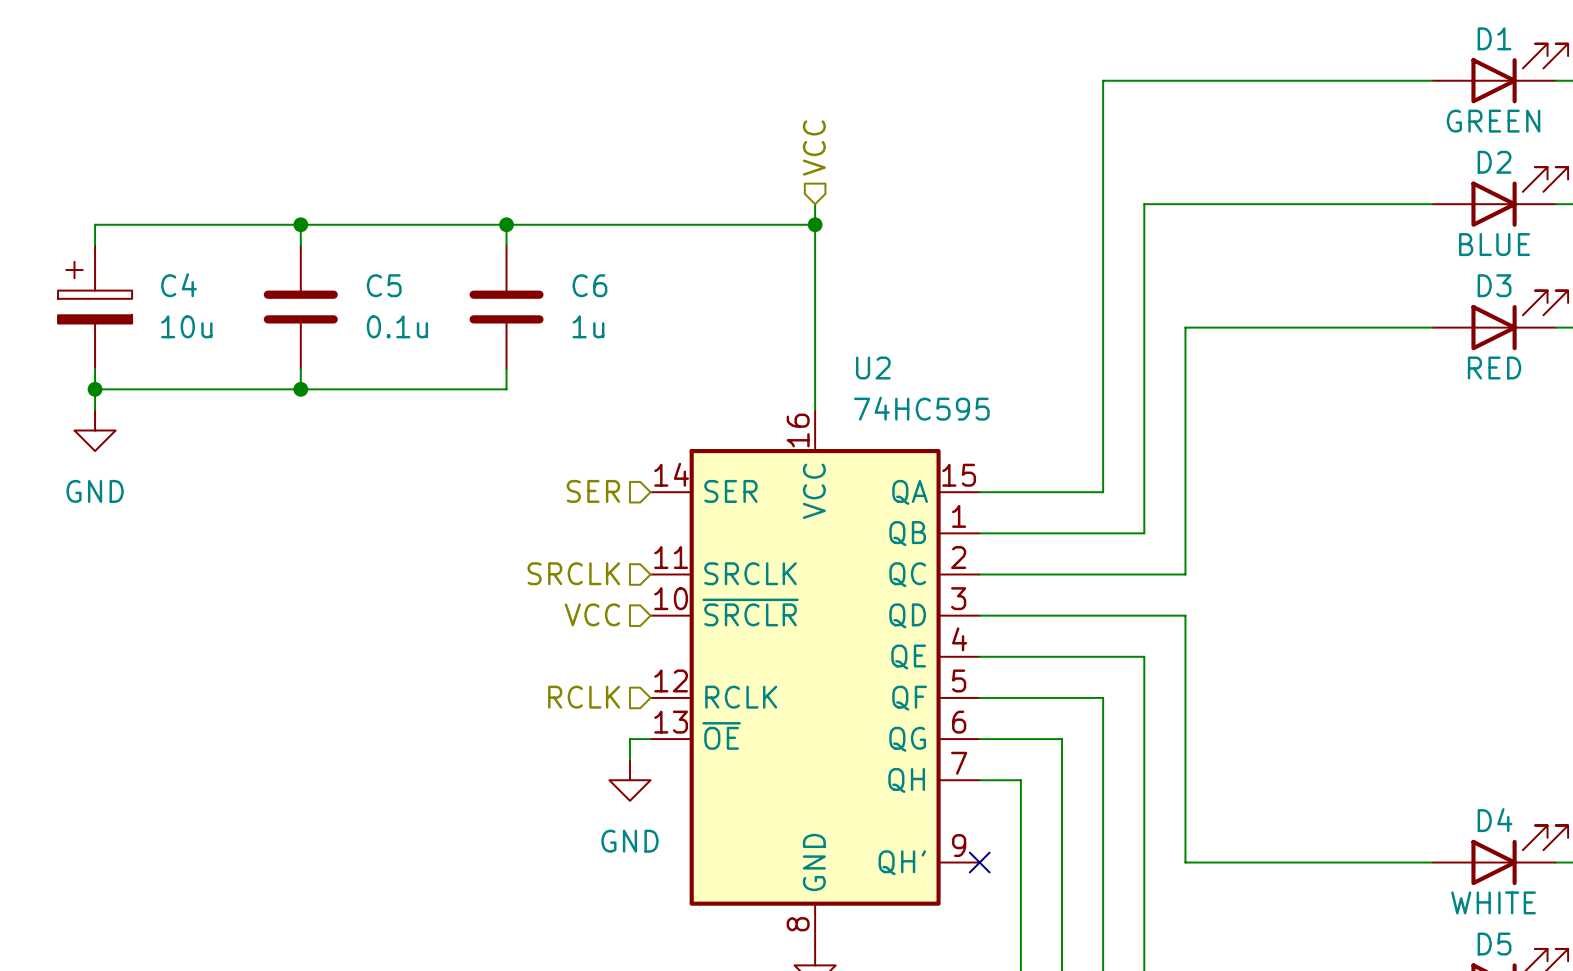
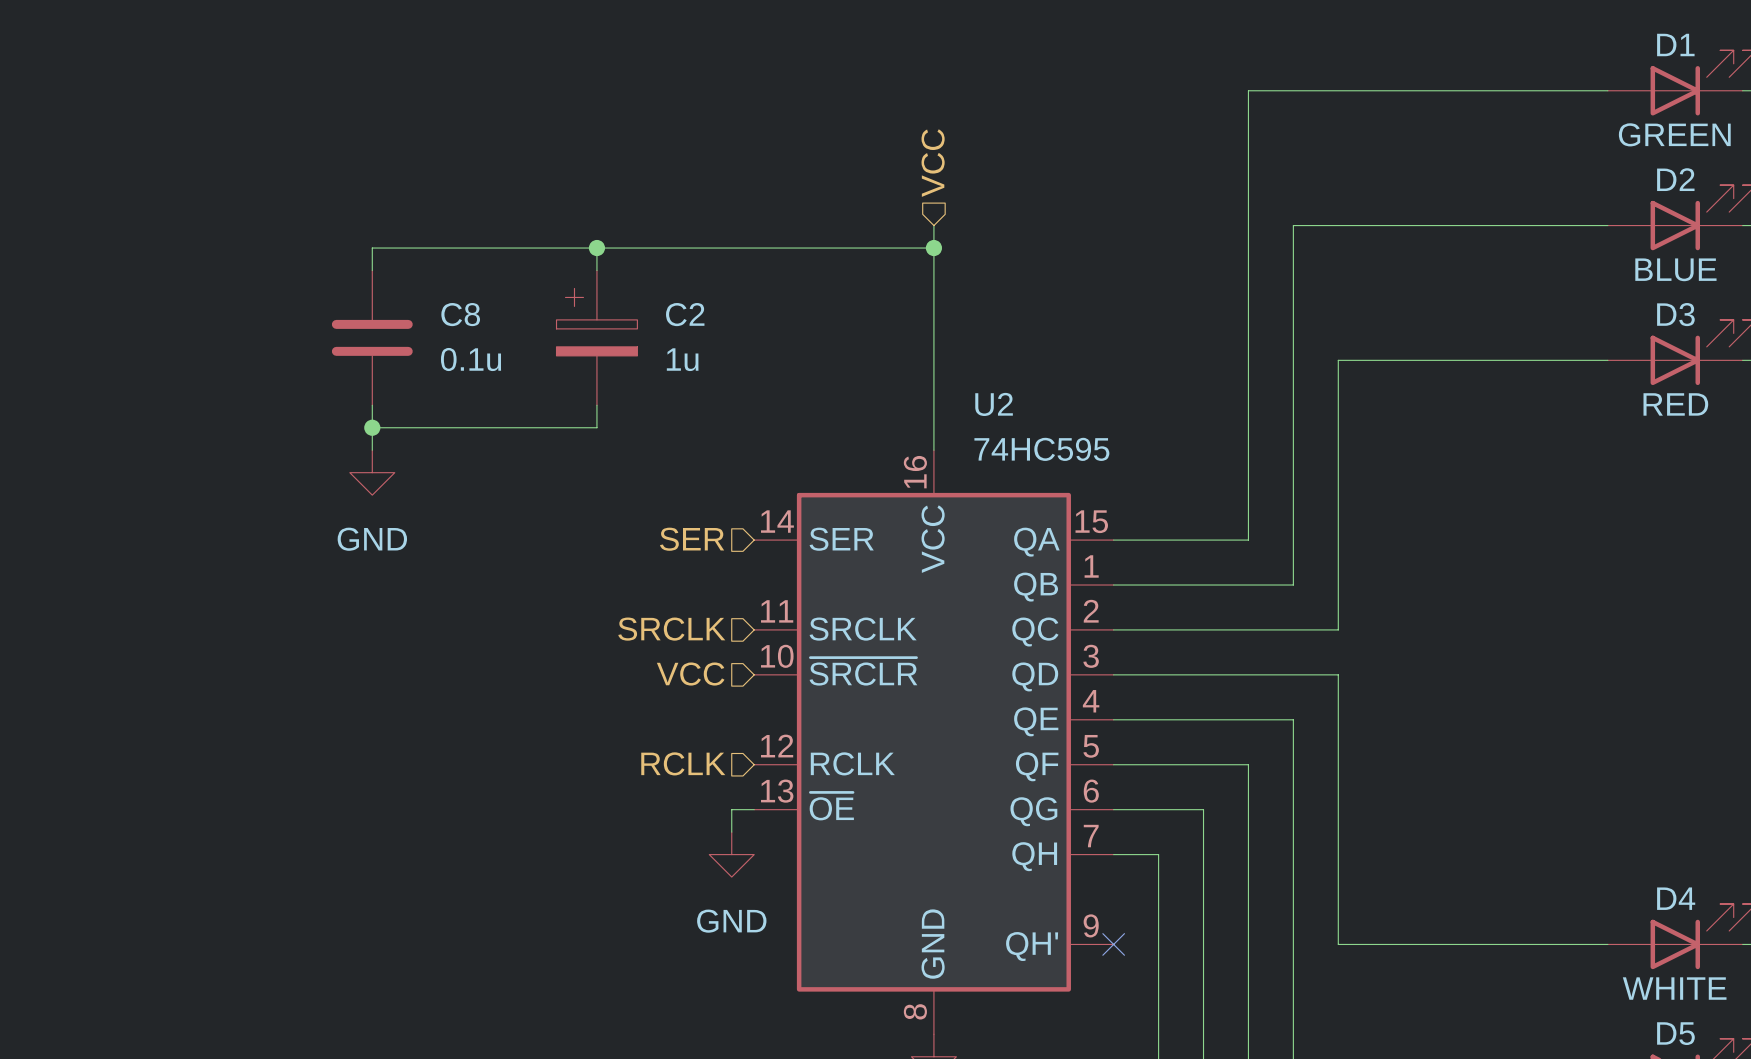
wire: (300, 224) (95, 224) (95, 245) -> none
junction: (300, 224) -> none
C5 name: C5 (384, 285) -> C8 (460, 314)
C4: 10u (95, 307) -> none
C6: 1u (506, 307) -> none
C2: none -> 1u (596, 337)
wire: (95, 368) (95, 409) -> none
wire: (95, 389) (300, 389) -> (372, 450) (372, 427)
junction: (95, 389) -> none
power symbol position: GND (95, 430) -> GND (372, 472)

